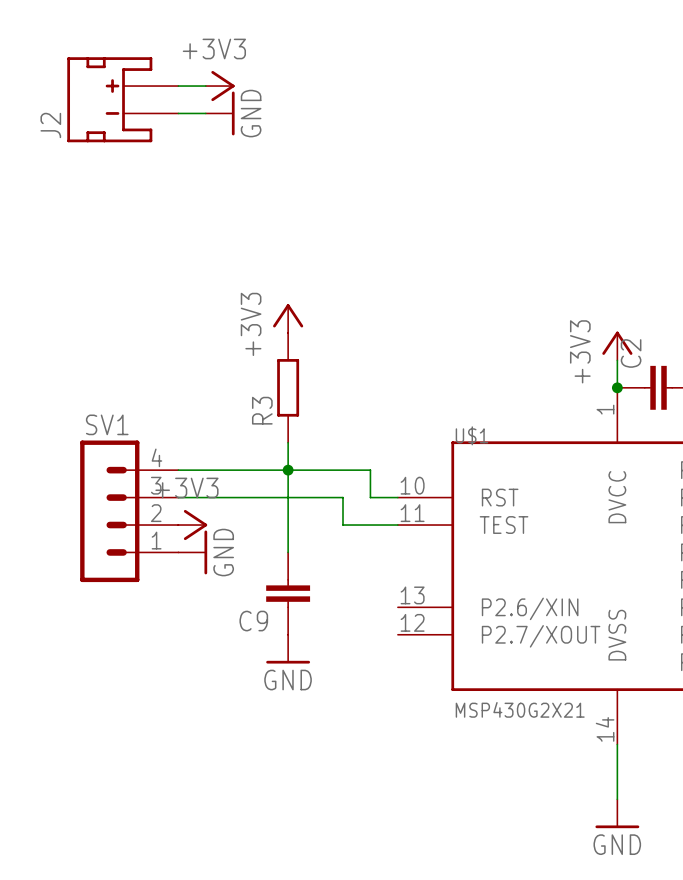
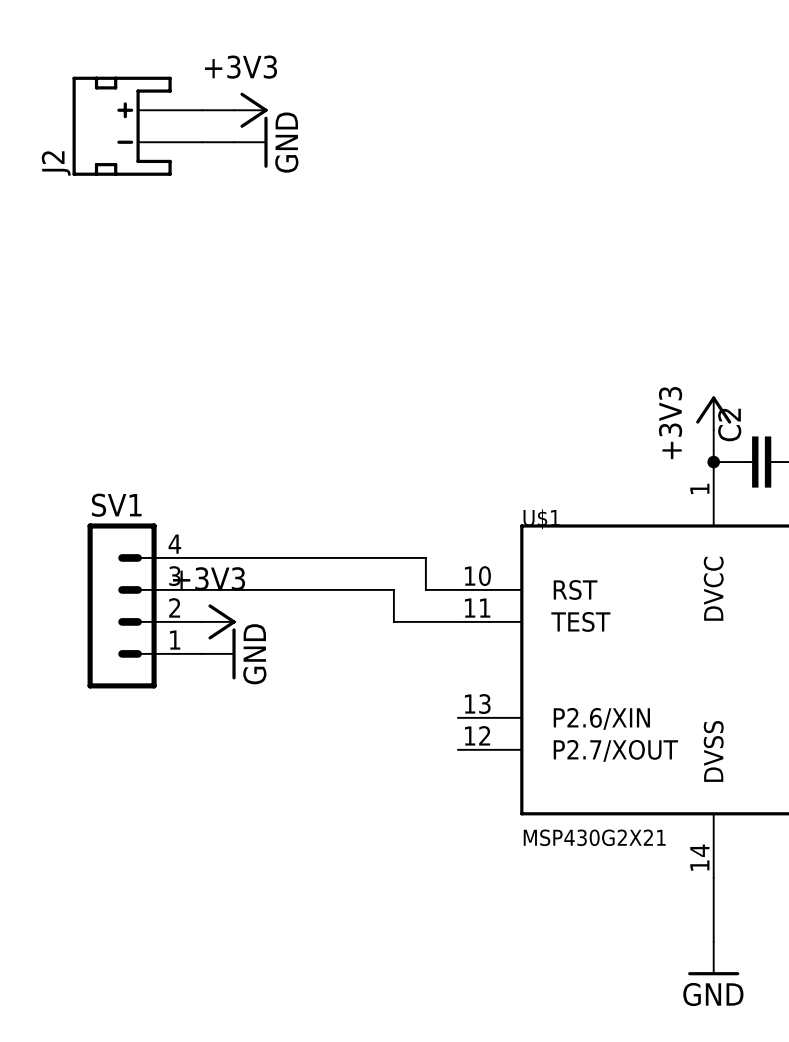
power symbol: +3V3 (288, 318) -> none
R3: (288, 387) -> none
wire: (288, 442) (288, 552) -> none
junction: (288, 470) -> none
C9: (288, 593) -> none
power symbol: GND (288, 649) -> none

